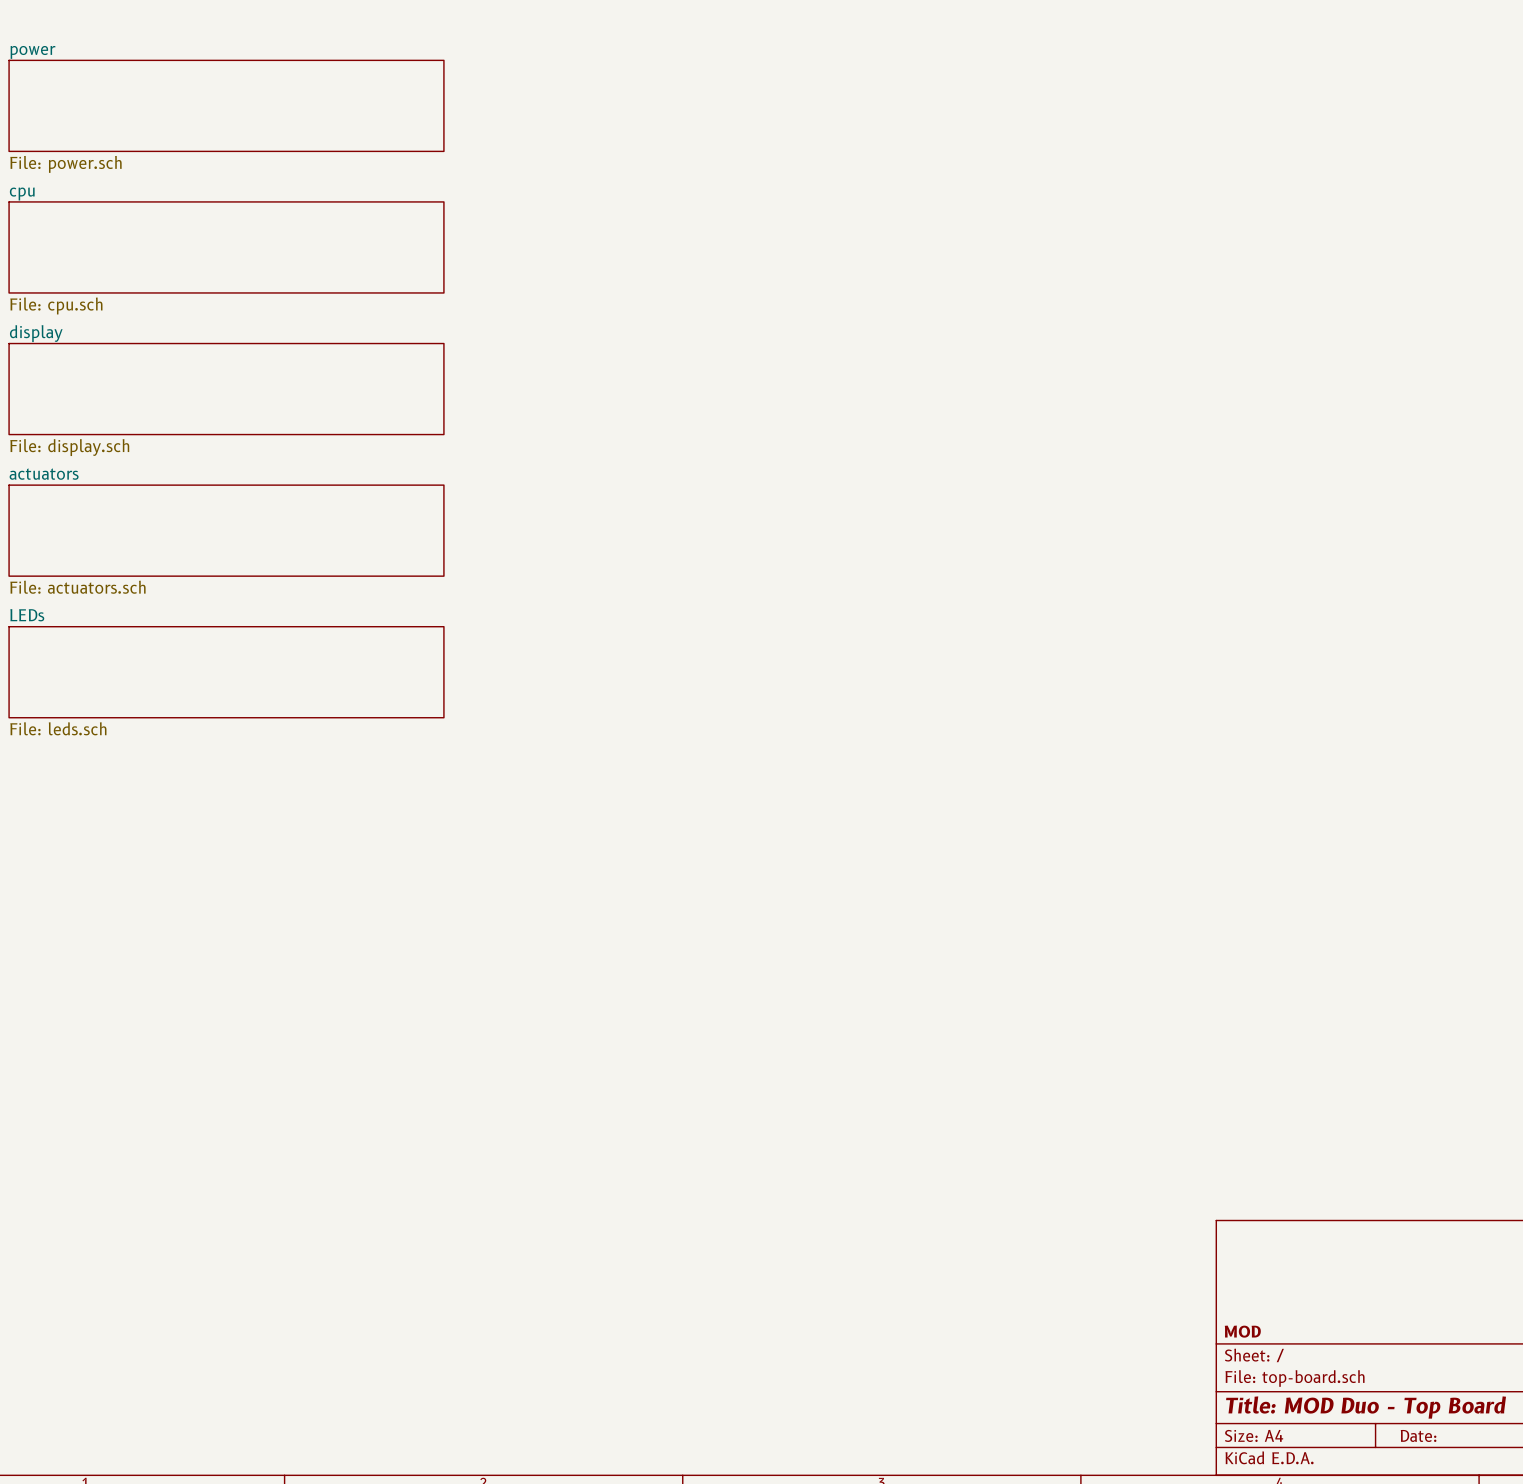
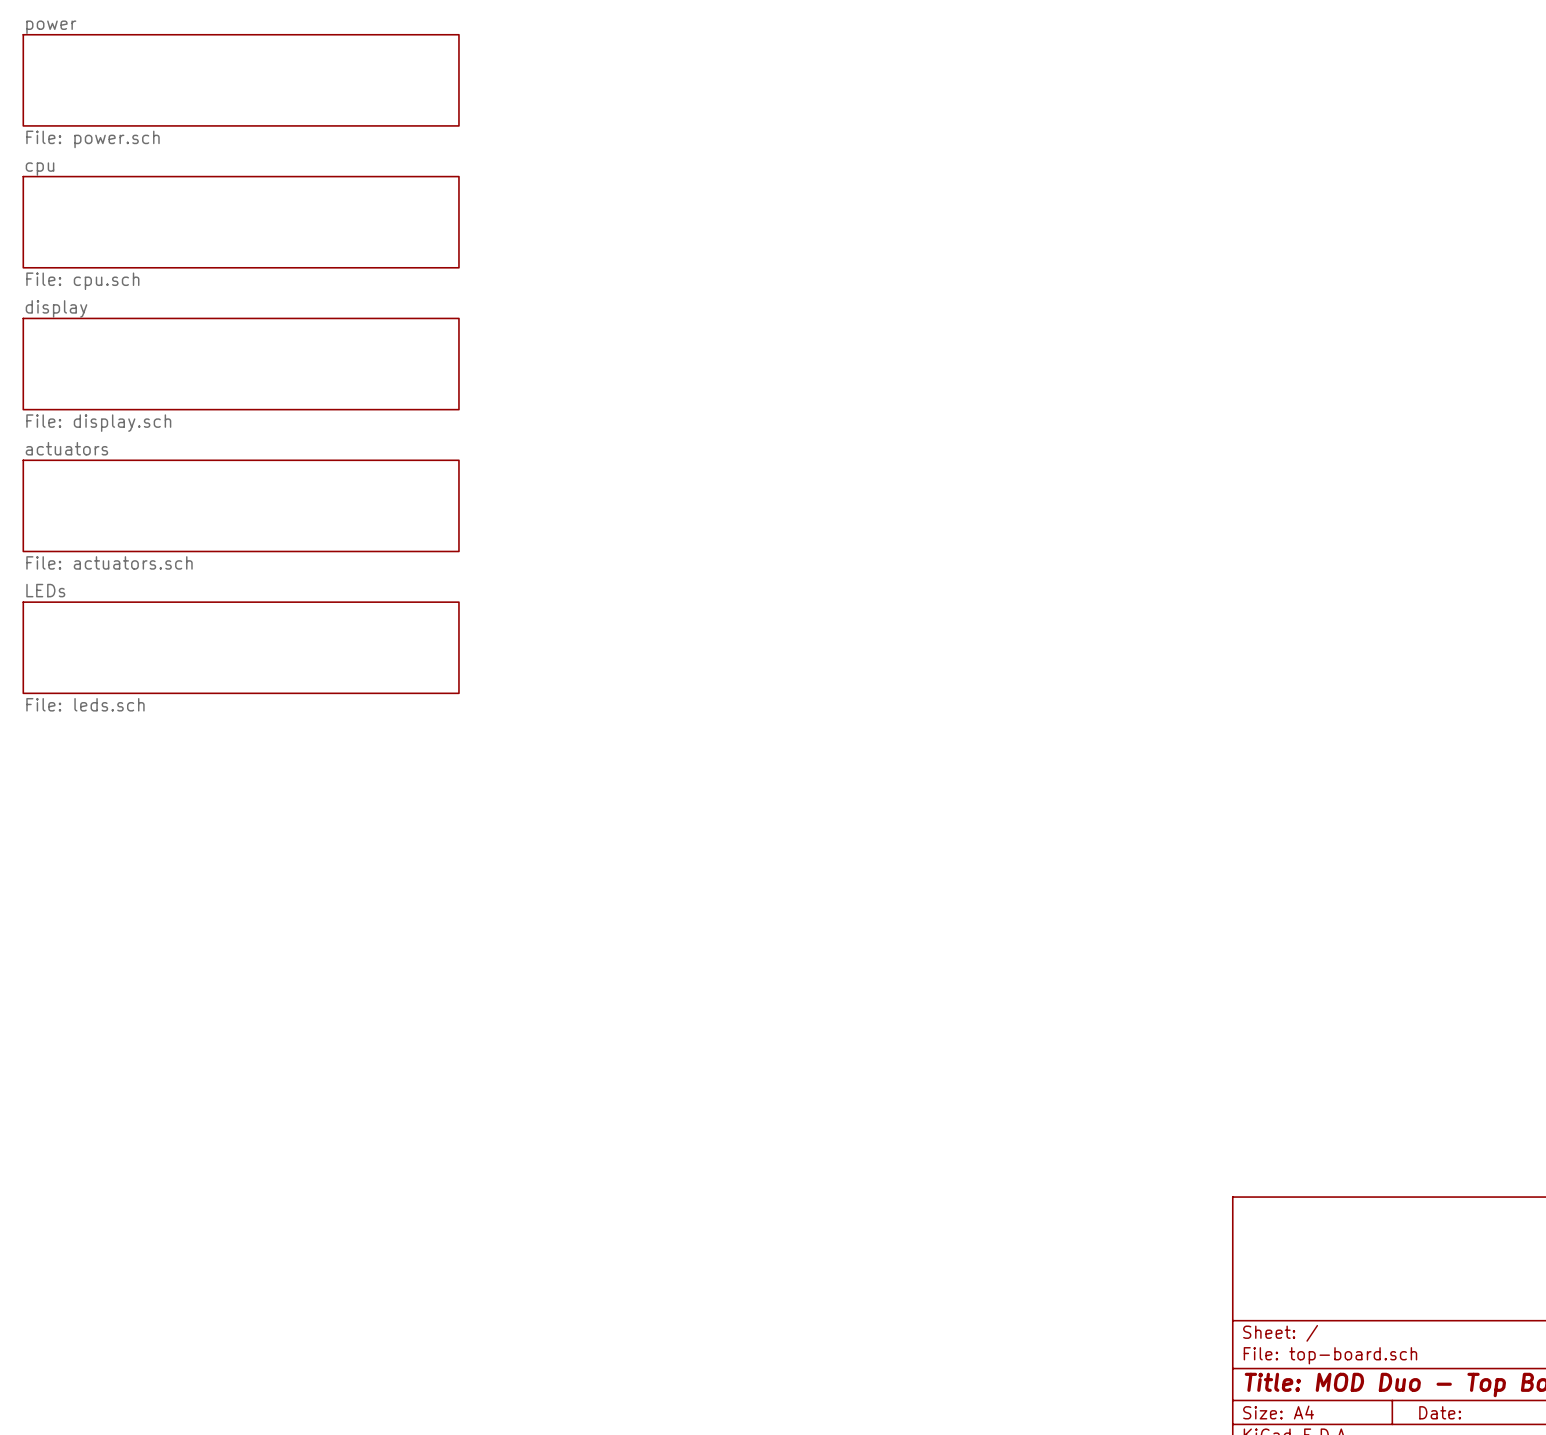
title block: MOD (1242, 1331) -> none

